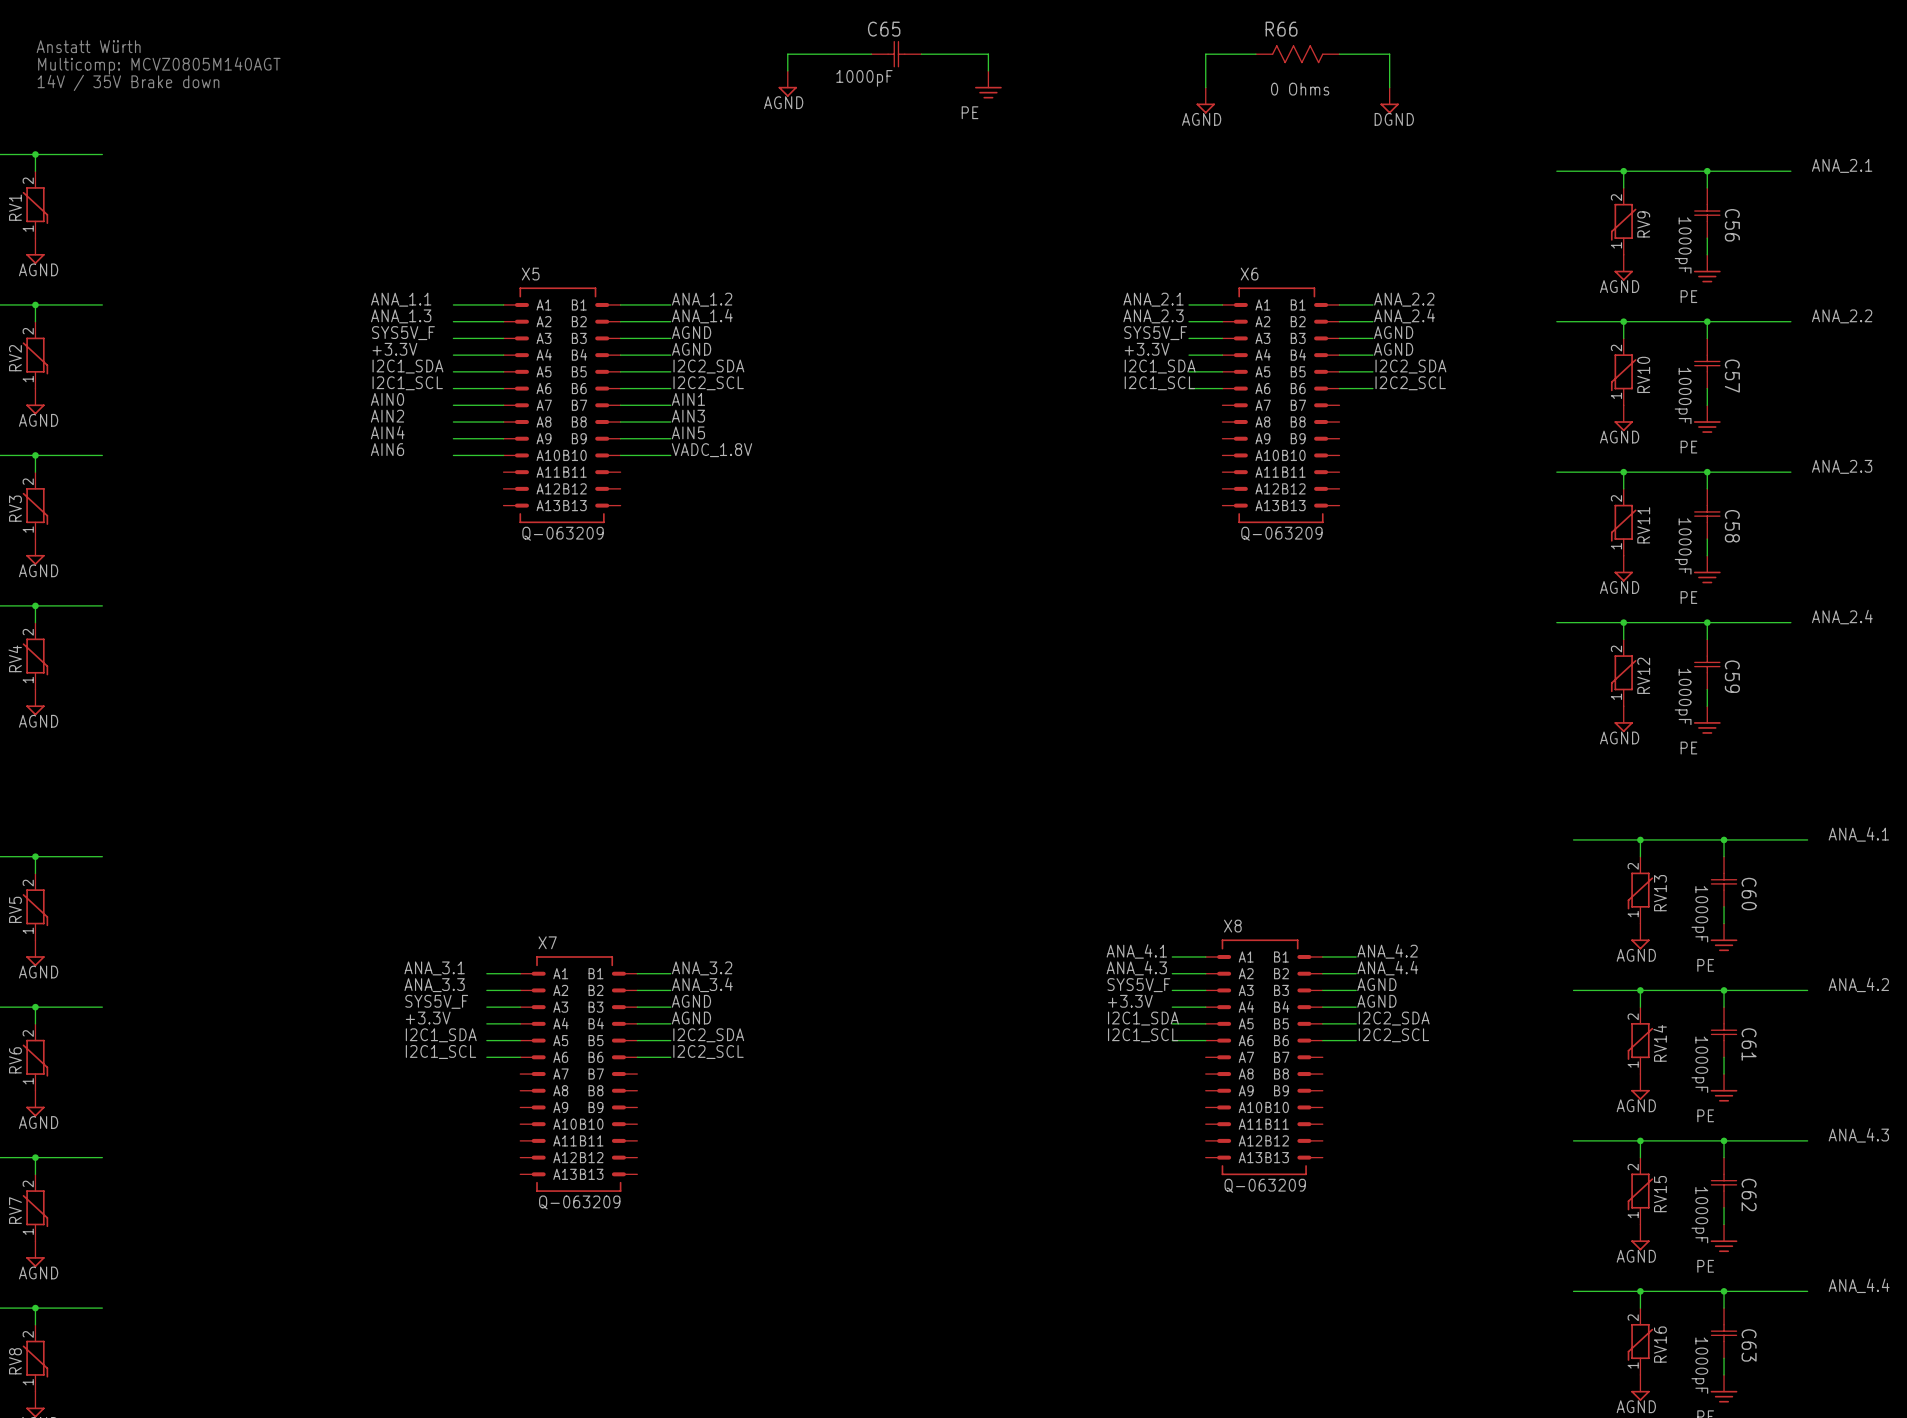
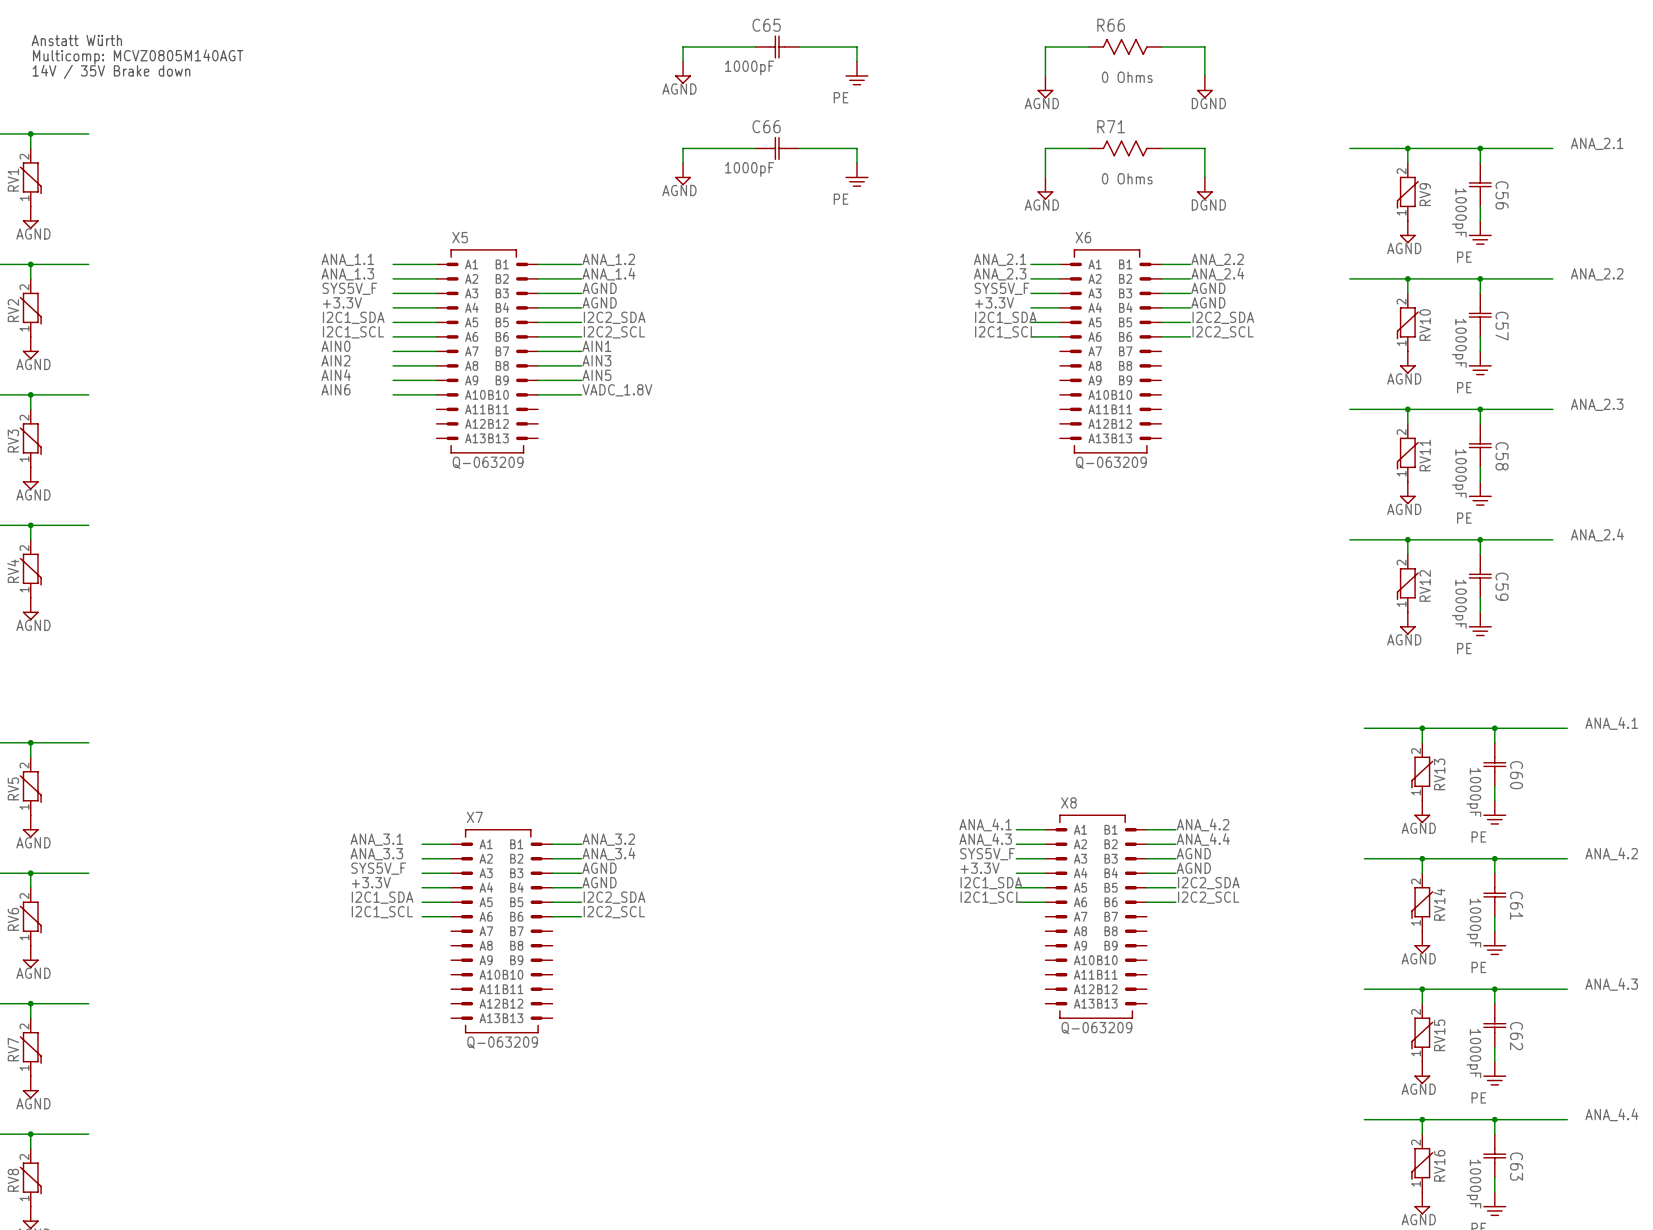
wire: none -> (755, 148) (683, 148) (683, 162)
C66: none -> 1000pF (777, 148)
wire: none -> (799, 148) (856, 148) (856, 162)
wire: none -> (1088, 148) (1045, 148) (1045, 177)
R71: none -> 0 Ohms (1125, 148)
wire: none -> (1161, 148) (1204, 148) (1204, 177)
power symbol: none -> AGND (683, 174)
power symbol: none -> PE (856, 174)
power symbol: none -> AGND (1045, 188)
power symbol: none -> DGND (1204, 188)

